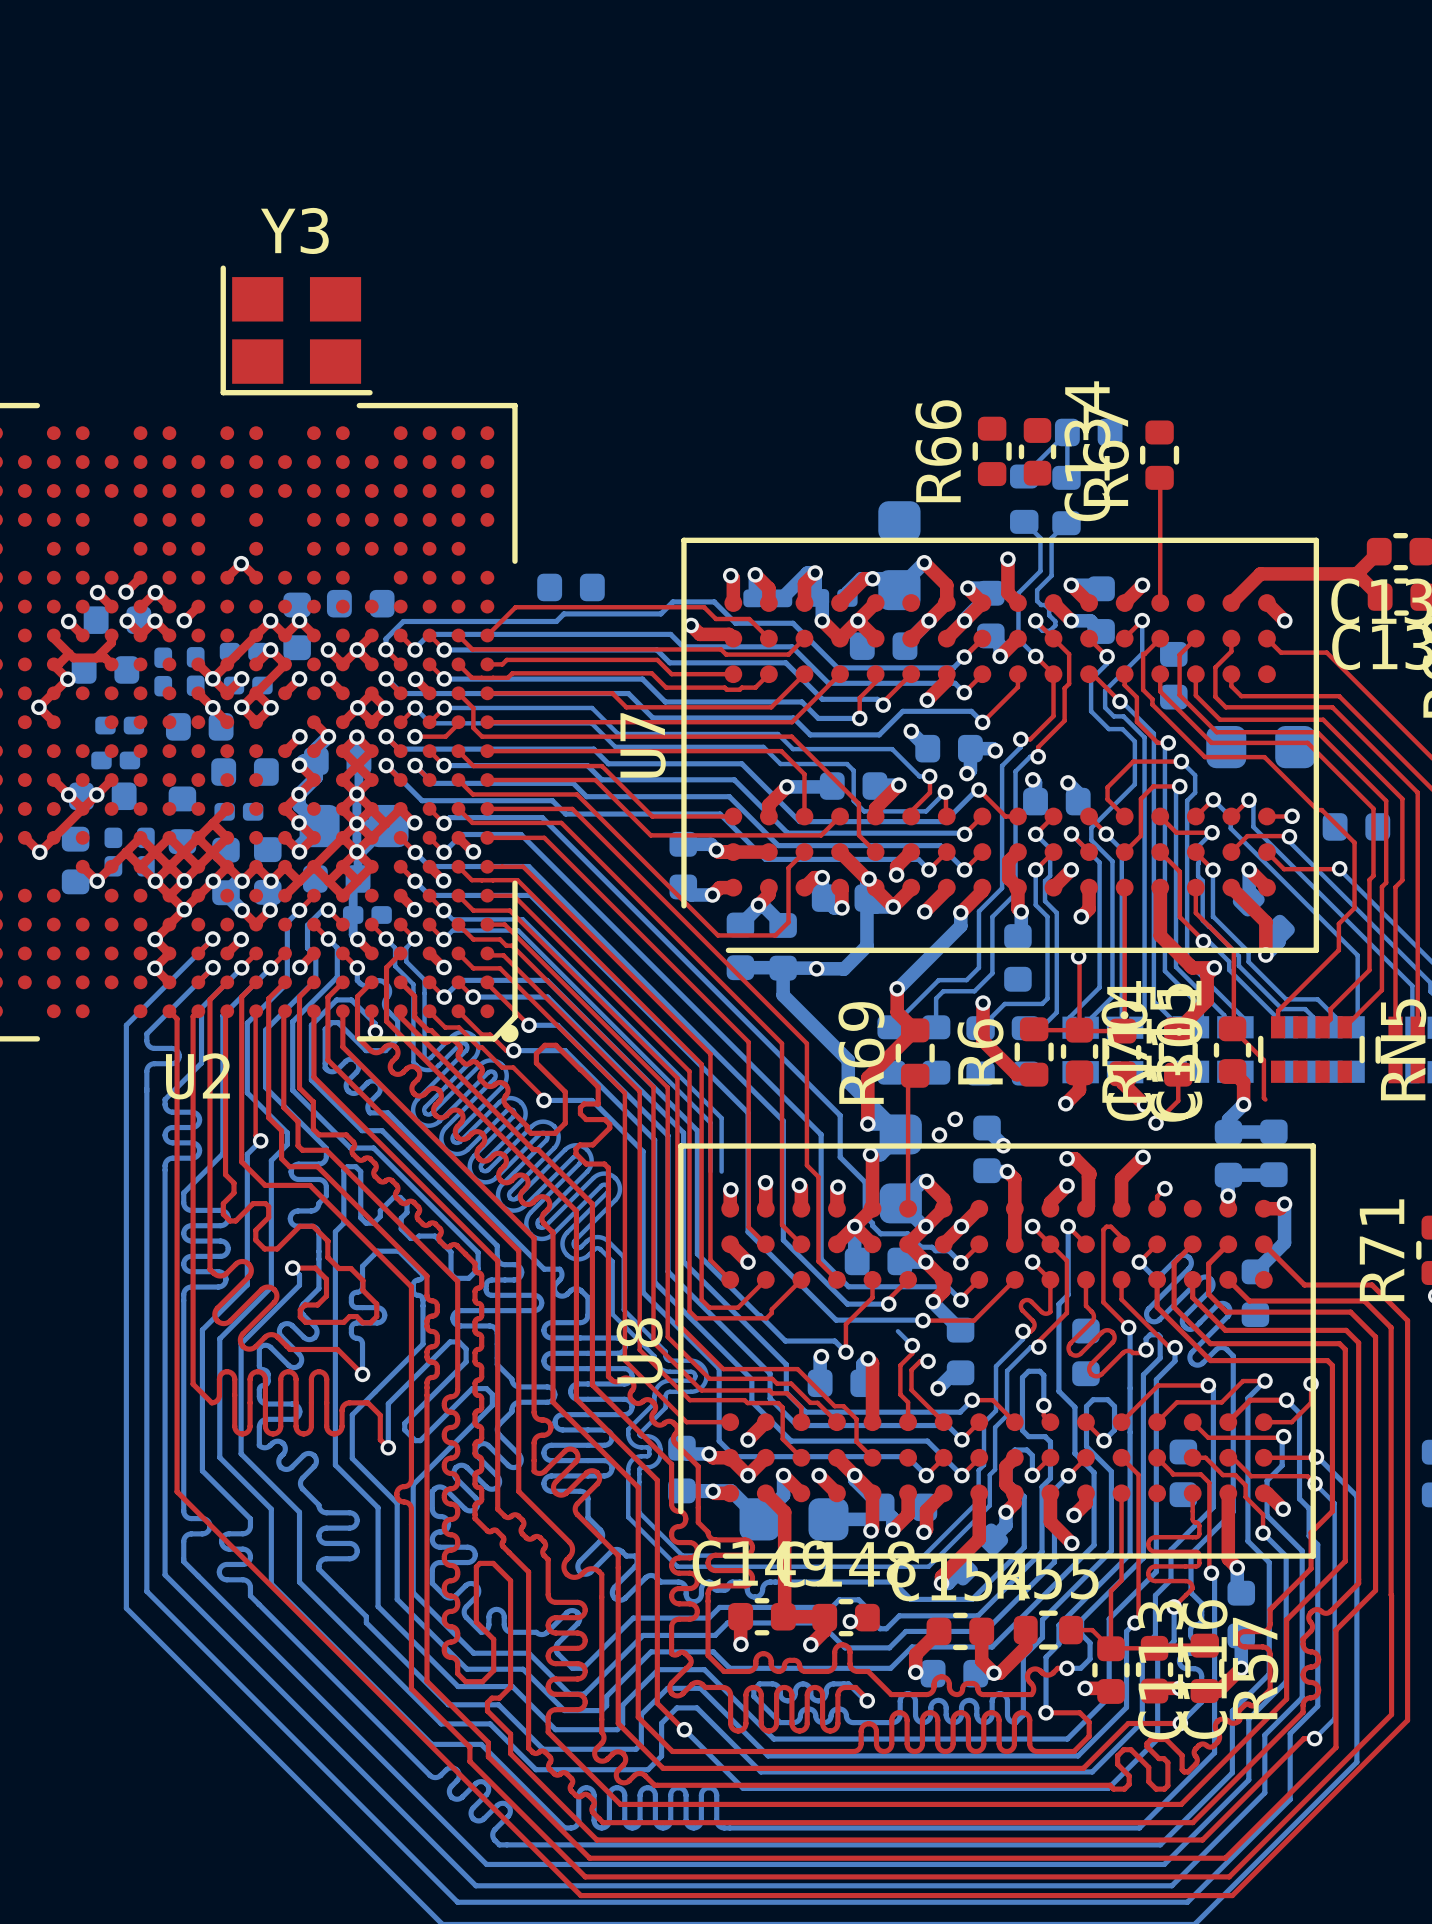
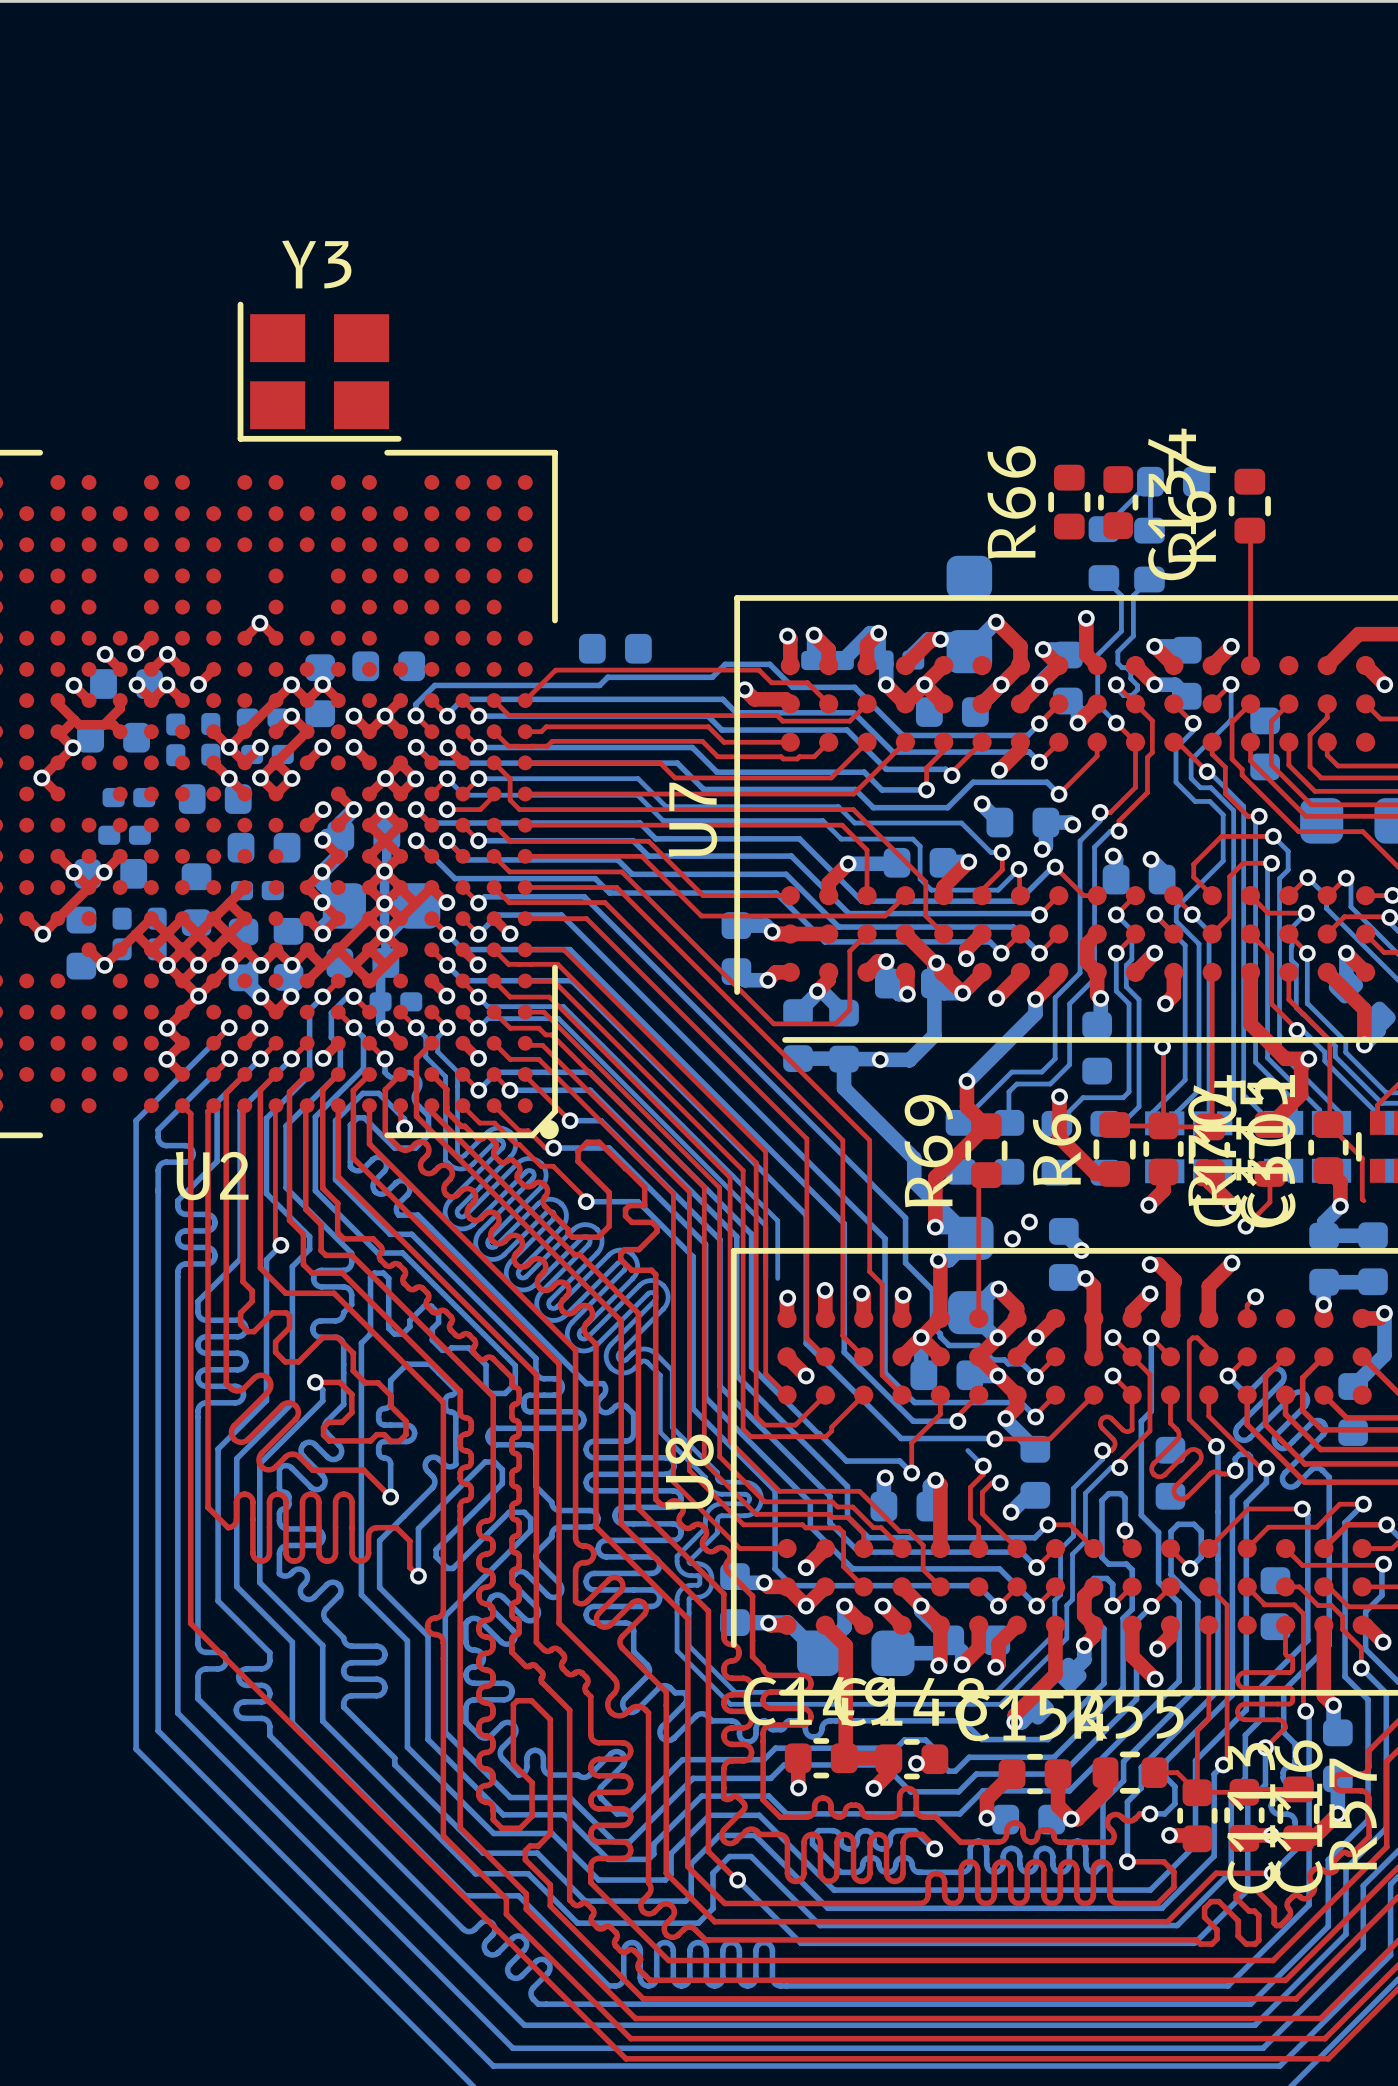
bottom track: (422, 1344) (401, 1365) -> (455, 1464) (448, 1466) (436, 1457) (427, 1459) (425, 1468) (434, 1480) (432, 1487)

